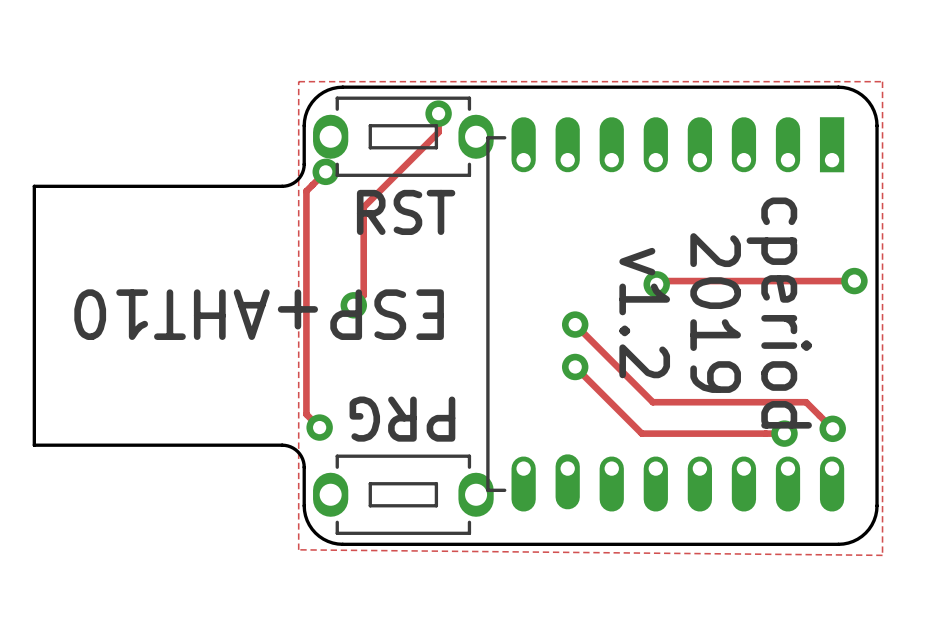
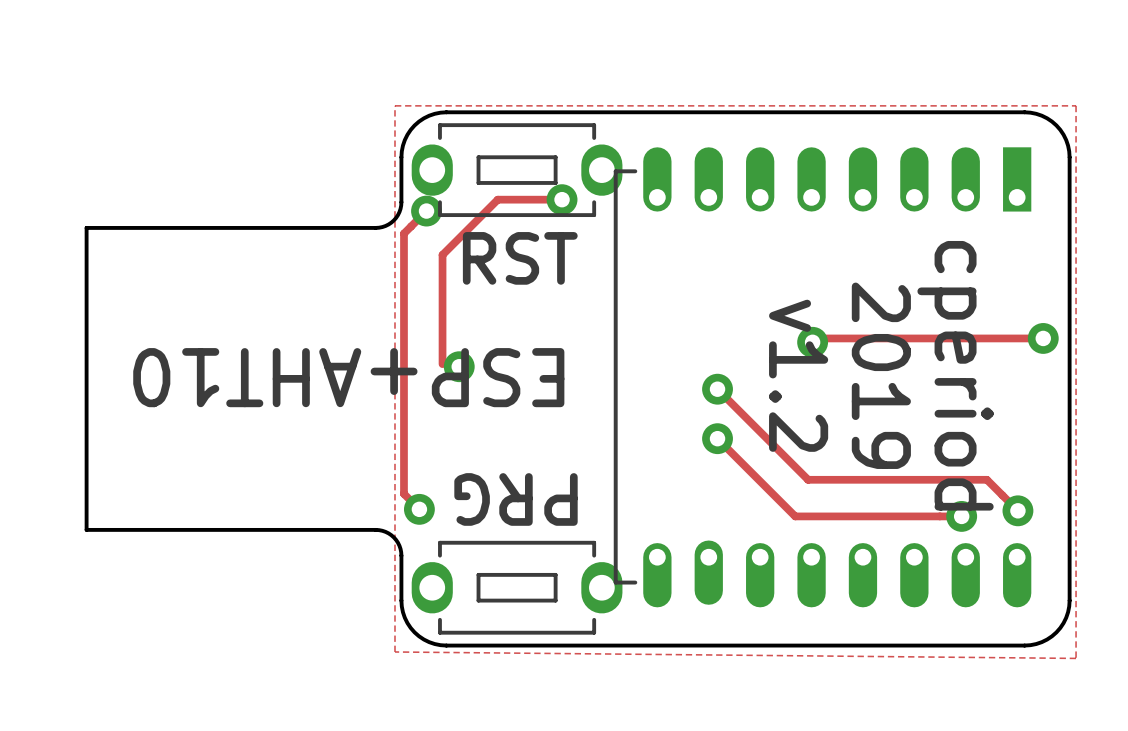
track: (438, 113) (438, 132) (363, 207) (363, 295) (353, 305) -> none
via position: (438, 113) -> (562, 199)
track: none -> (562, 199) (497, 199) (442, 254) (442, 364)

